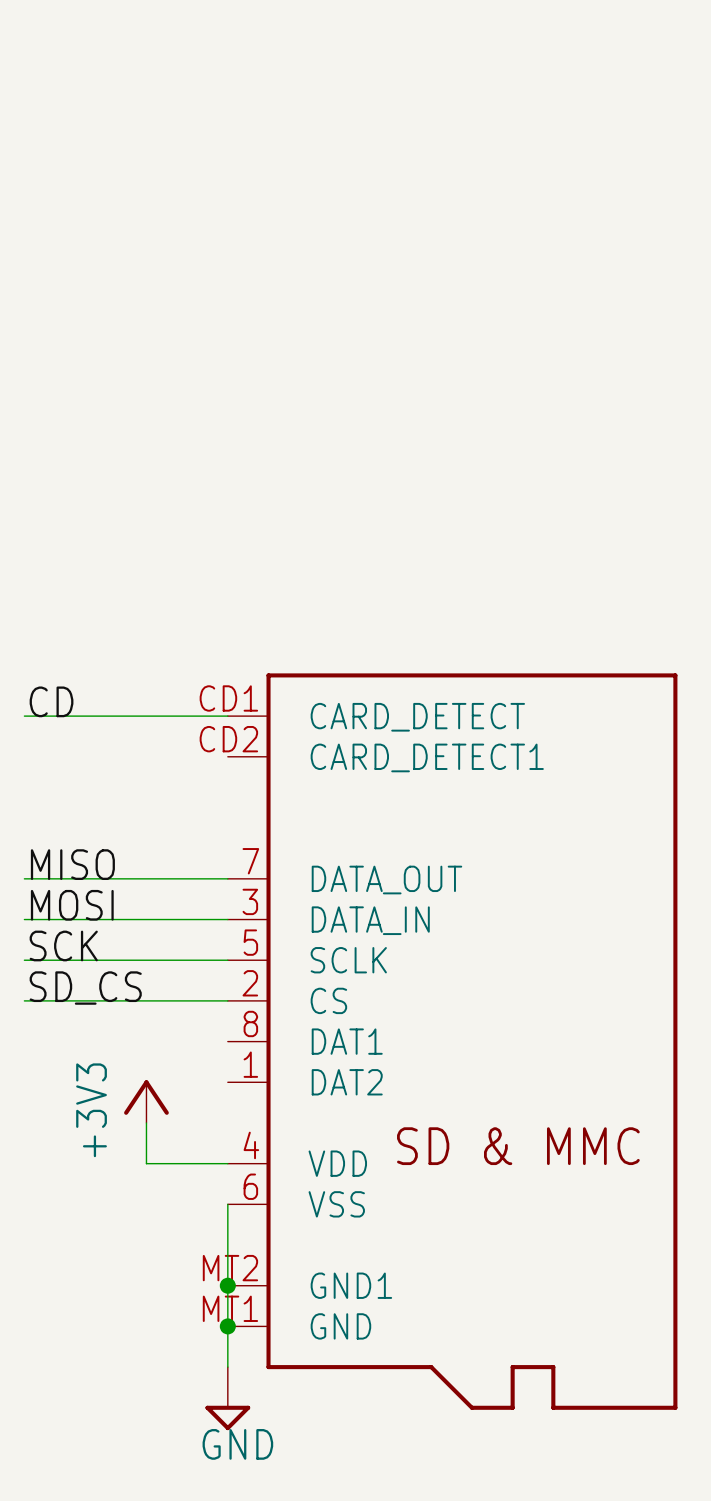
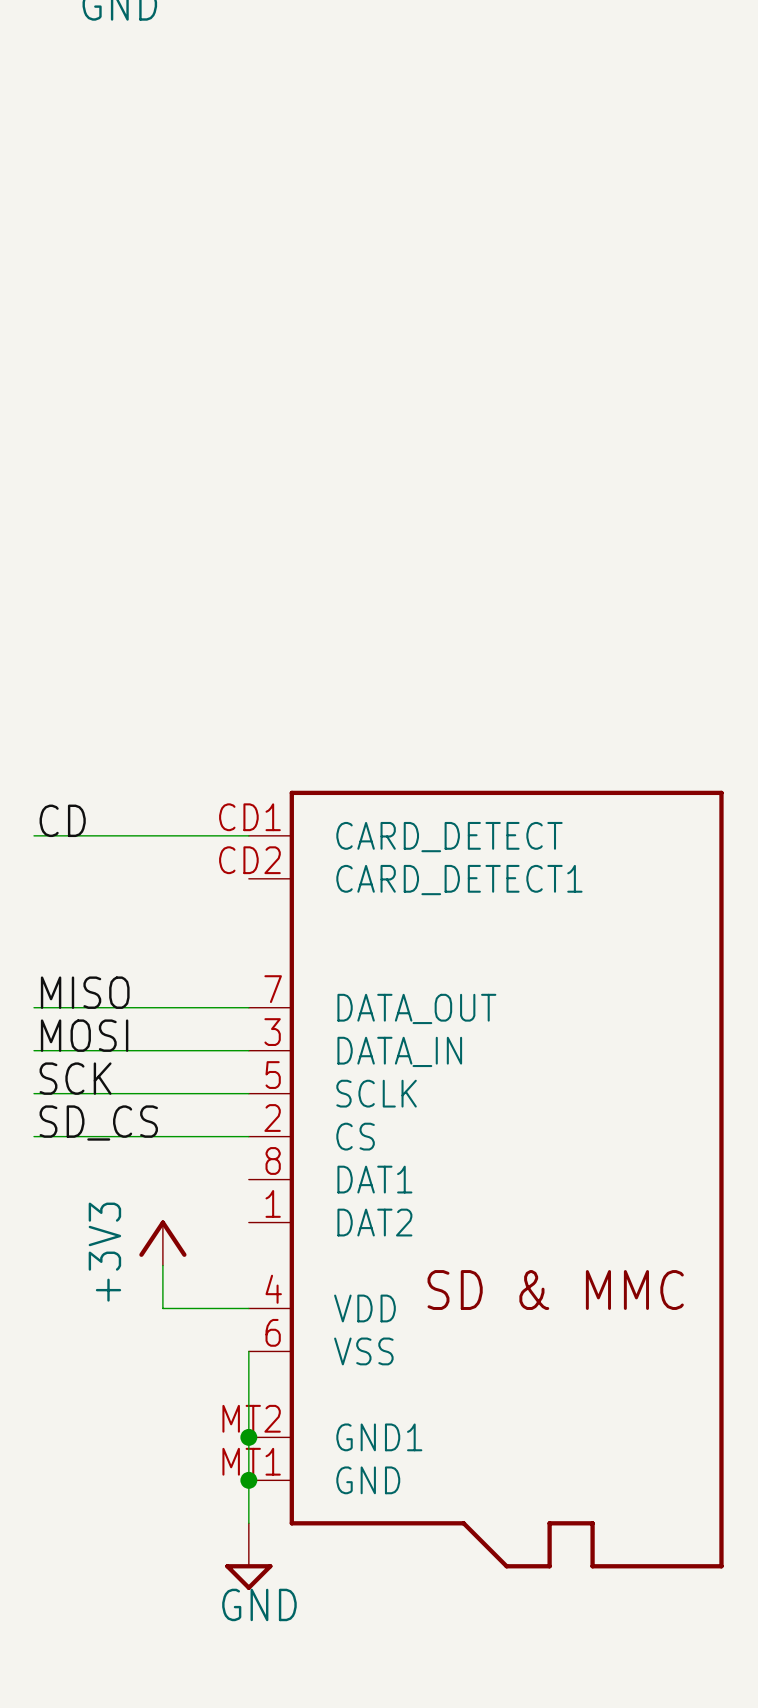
label position: CD (51, 701) -> CD (62, 820)
wire: (24, 716) (227, 716) -> (34, 835) (248, 835)
label: none -> MISO (85, 992)
label: MISO (72, 864) -> MOSI (84, 1035)
label: MOSI (72, 905) -> SCK (75, 1078)
label: SCK (63, 945) -> SD_CS (98, 1123)
label: SD_CS (85, 988) -> none
wire: (24, 1000) (227, 1000) -> (34, 1007) (248, 1007)
part position: (452, 1041) -> (486, 1179)
wire: none -> (162, 1265) (162, 1308) (248, 1308)
power symbol position: +3V3 (146, 1101) -> +3V3 (162, 1242)
wire: (146, 1122) (146, 1163) (227, 1163) -> (248, 1394) (248, 1351)
junction position: (227, 1326) -> (248, 1437)
power symbol position: GND (227, 1398) -> GND (248, 1556)

